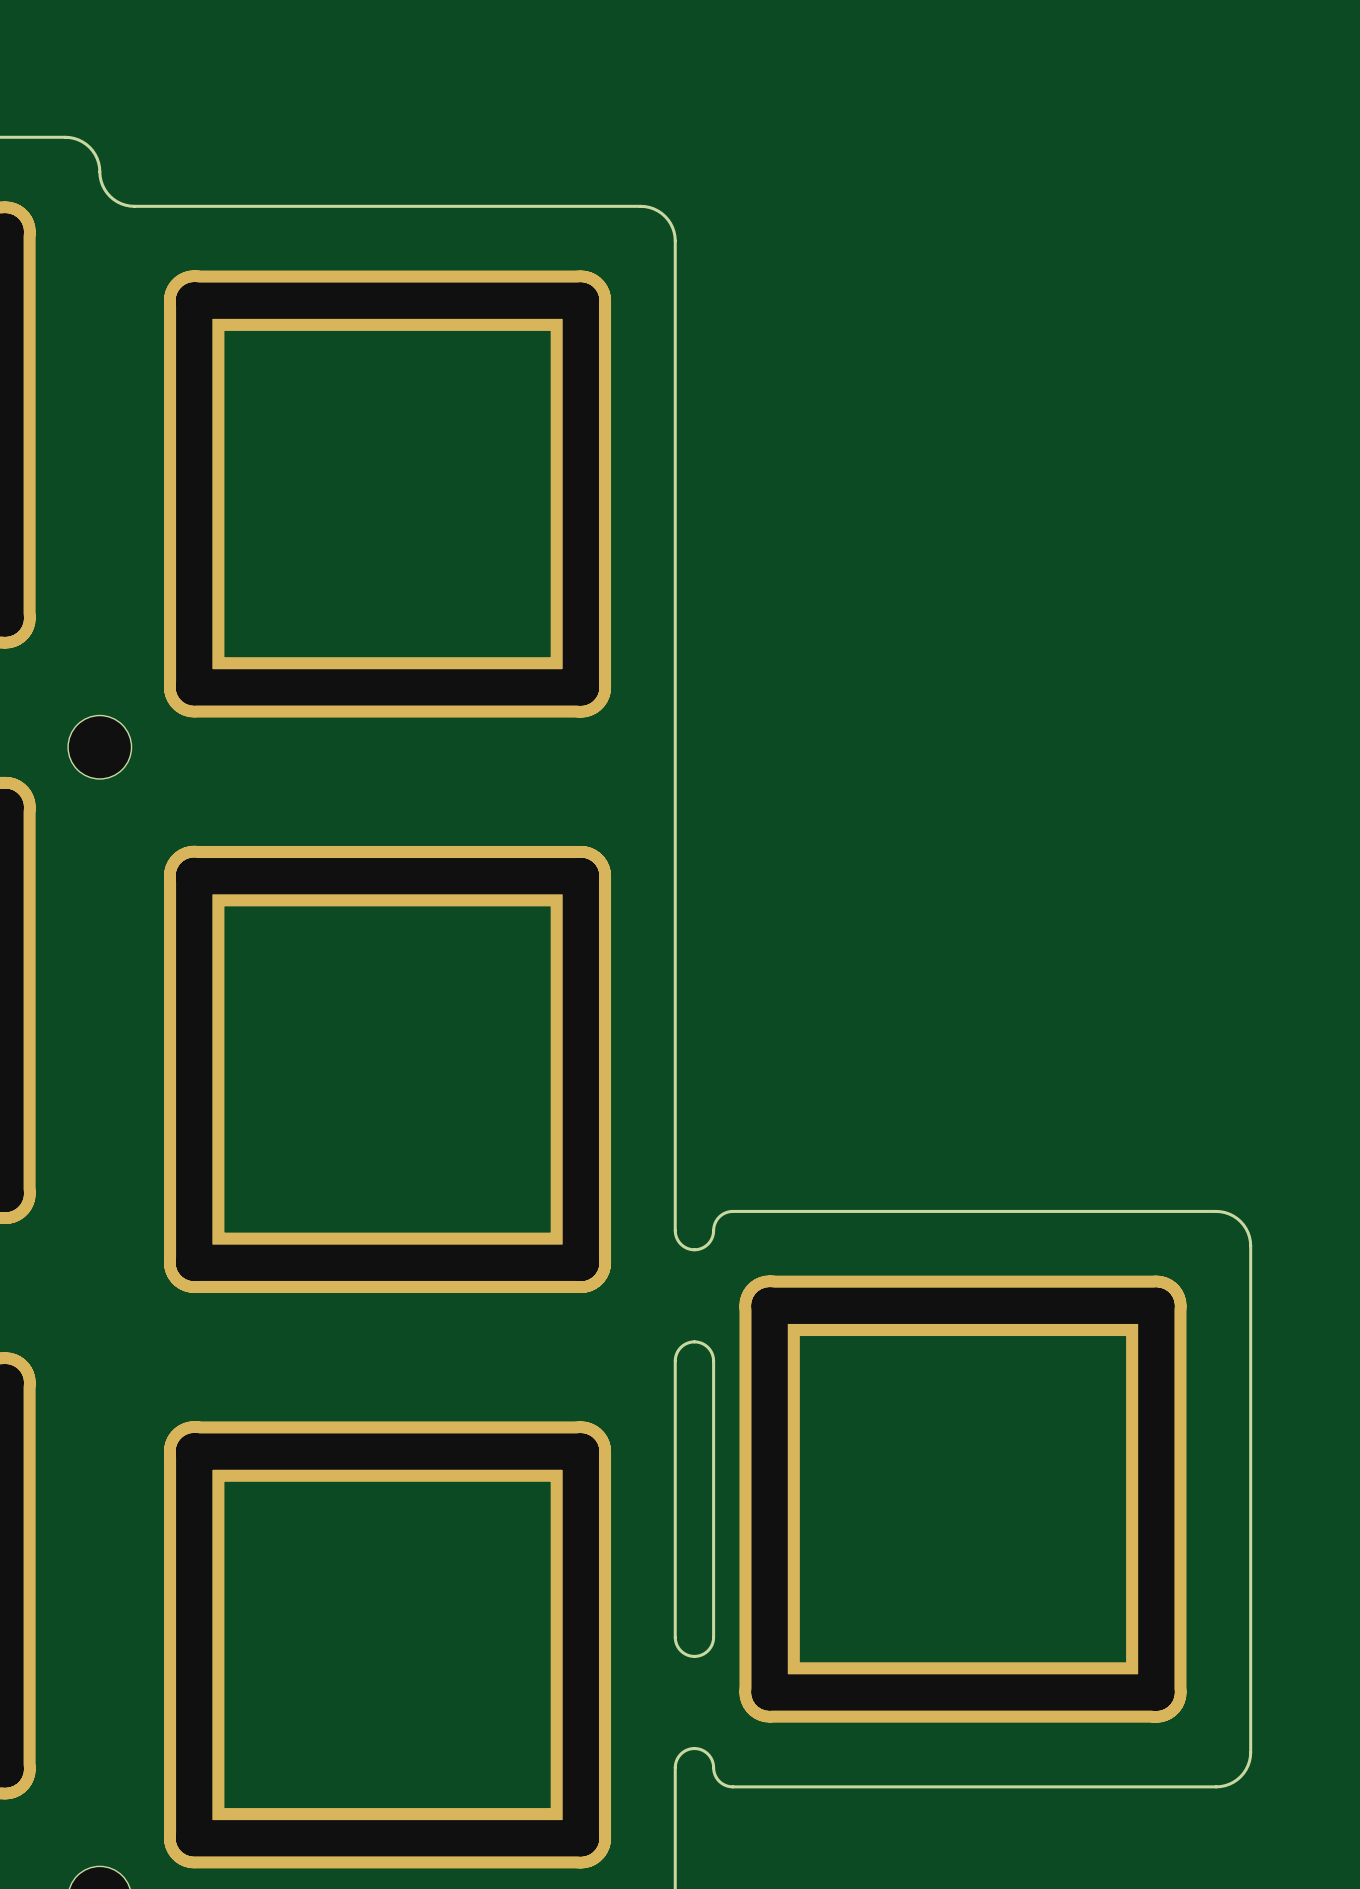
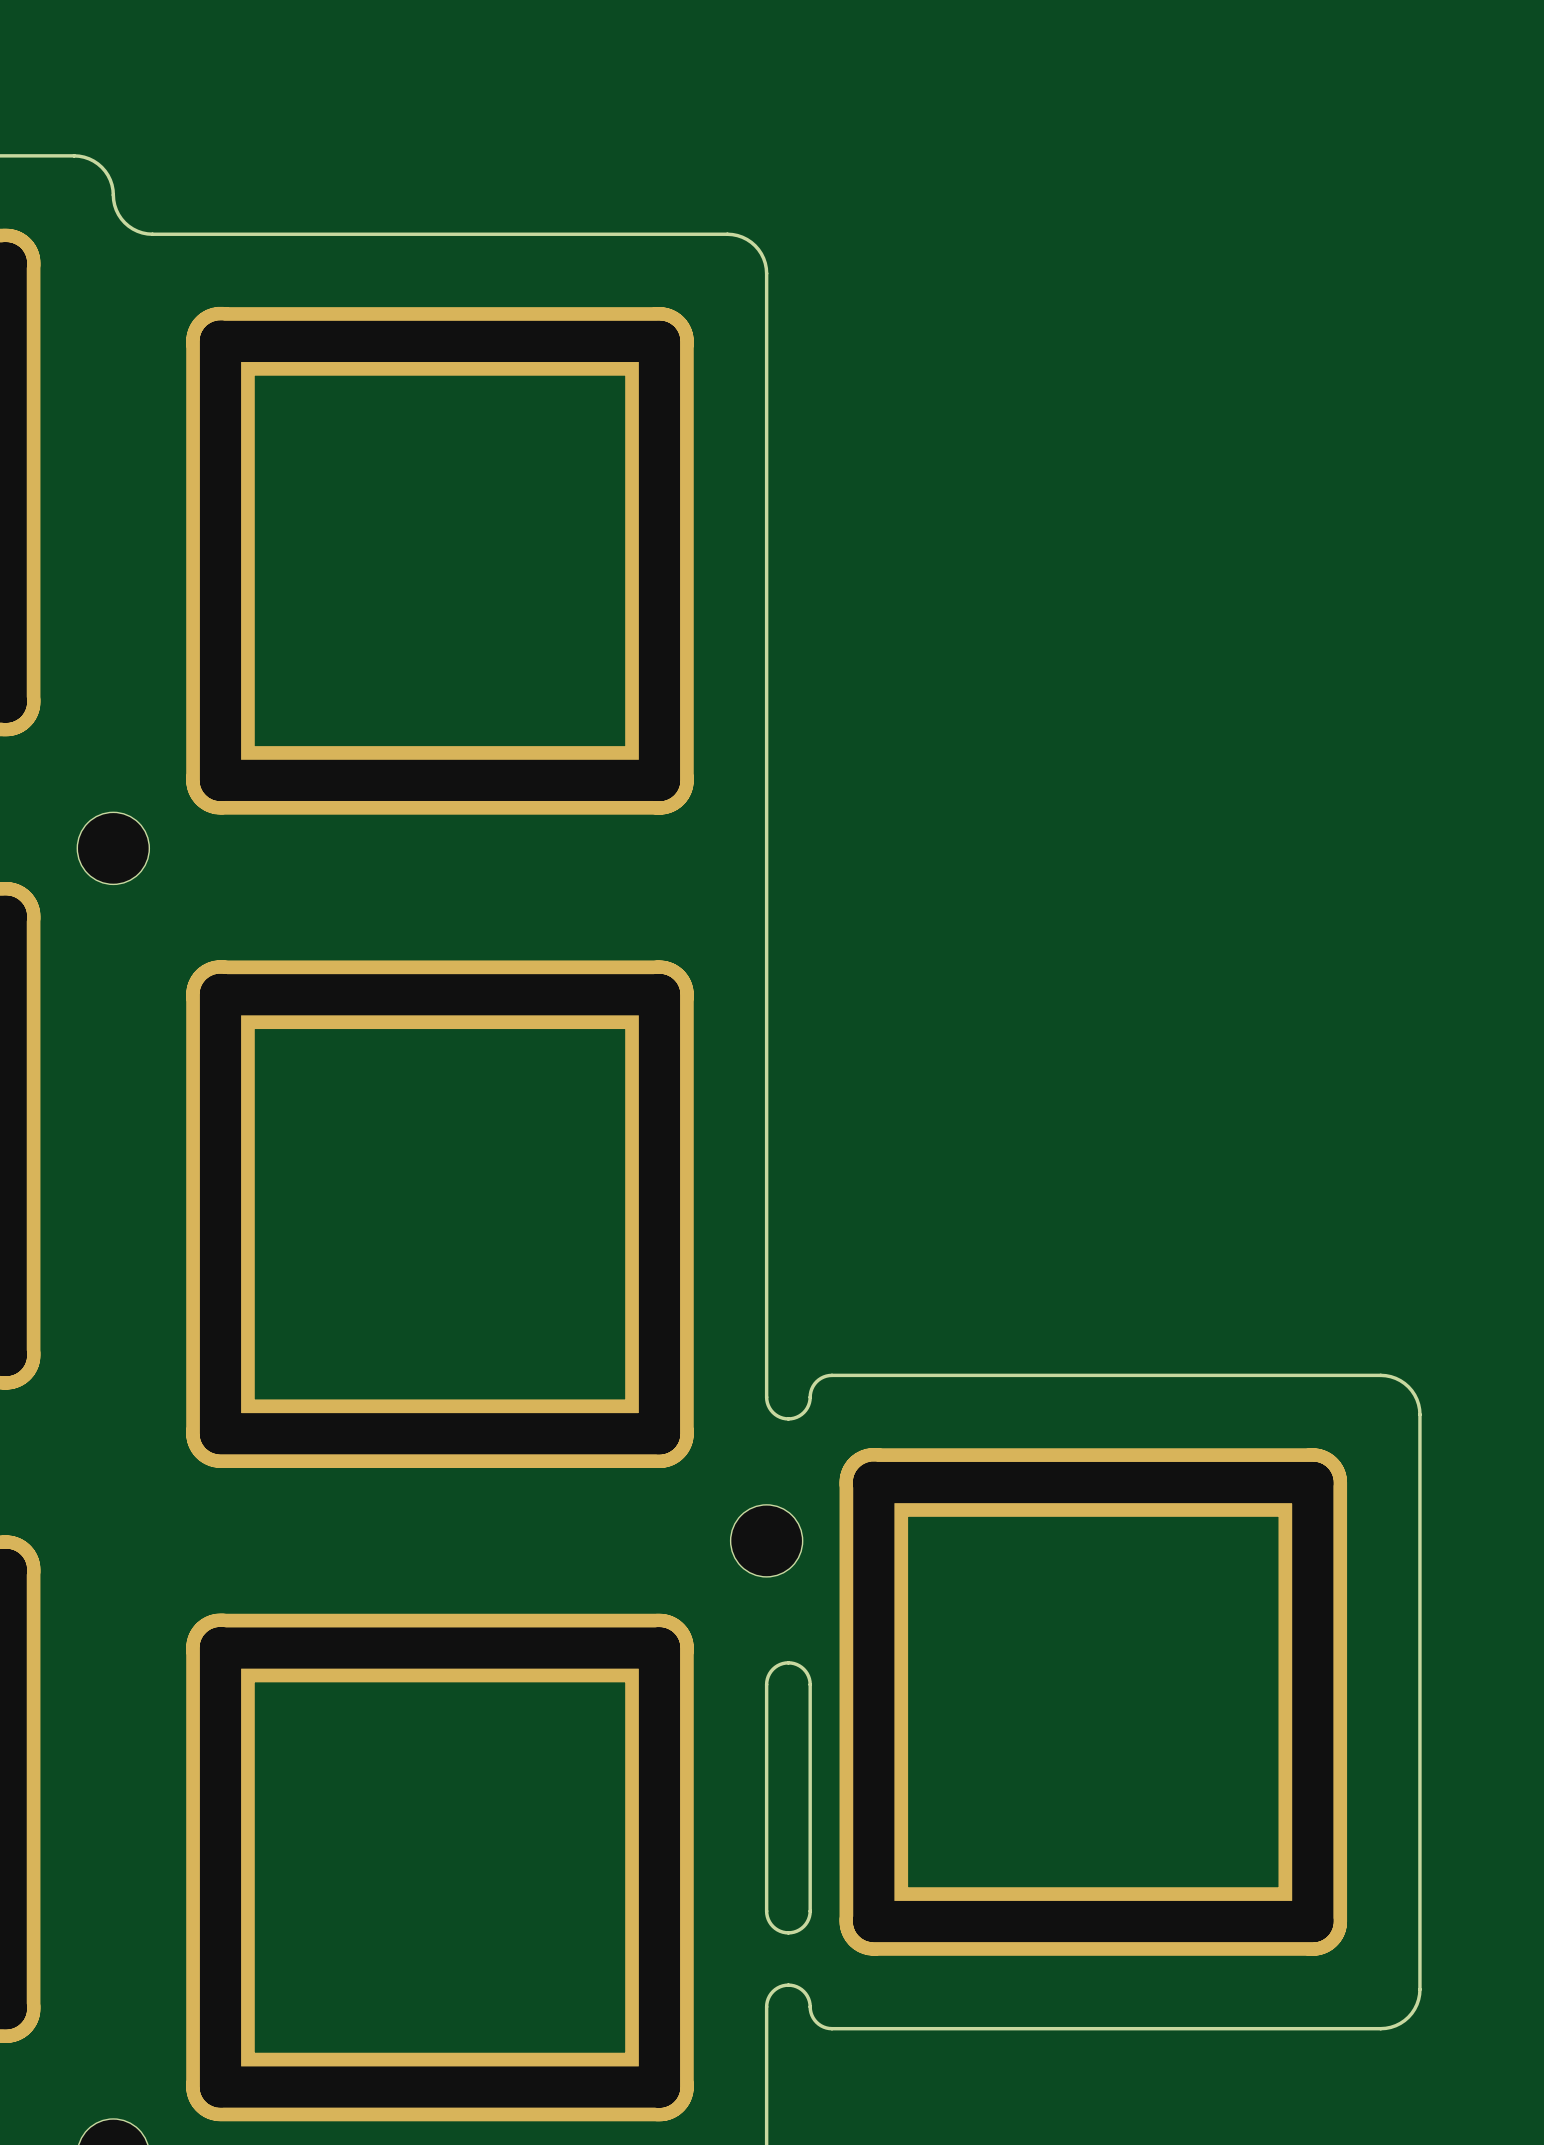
part: none -> (766, 1540)
board edge: (713, 1483) (713, 1358) (708, 1347) (694, 1341) (680, 1347) (675, 1358) (675, 1483) -> (810, 1684) (808, 1676) (803, 1669) (796, 1664) (788, 1662) (780, 1664) (773, 1669) (768, 1676) (766, 1684)
board edge: (713, 1637) (708, 1650) (694, 1656) (680, 1650) (675, 1637) -> (810, 1858) (809, 1916) (801, 1928) (788, 1932) (775, 1928) (767, 1916) (766, 1858)

